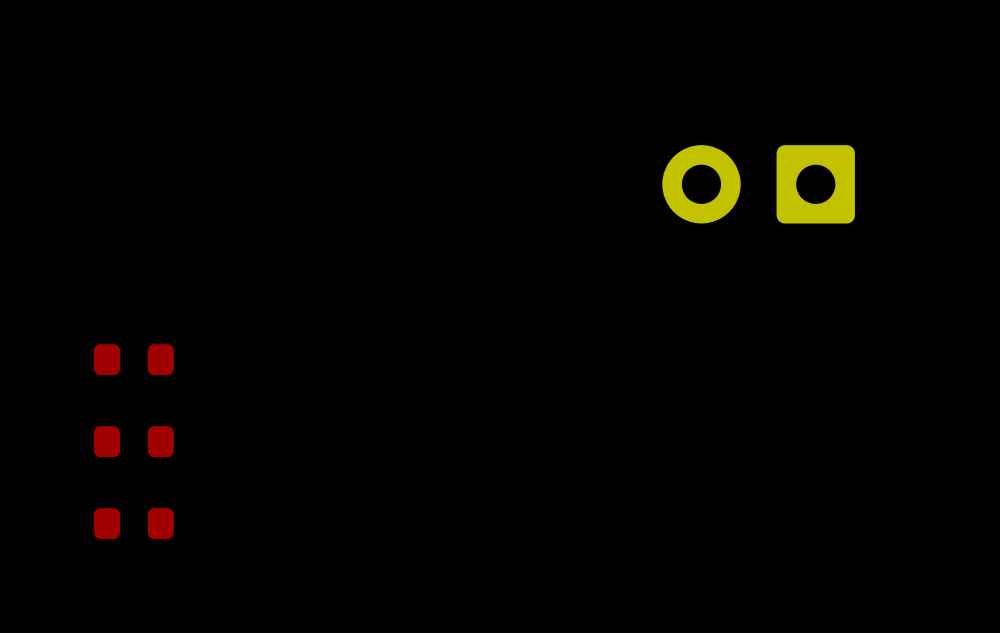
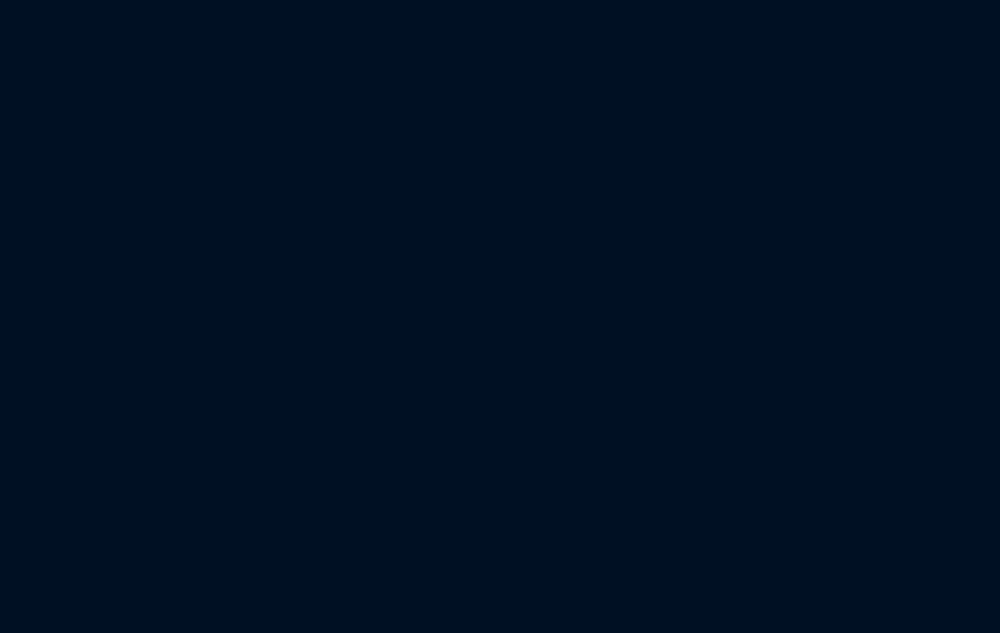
part: (758, 184) -> none
part: (133, 359) -> none
part: (133, 441) -> none
part: (133, 523) -> none

